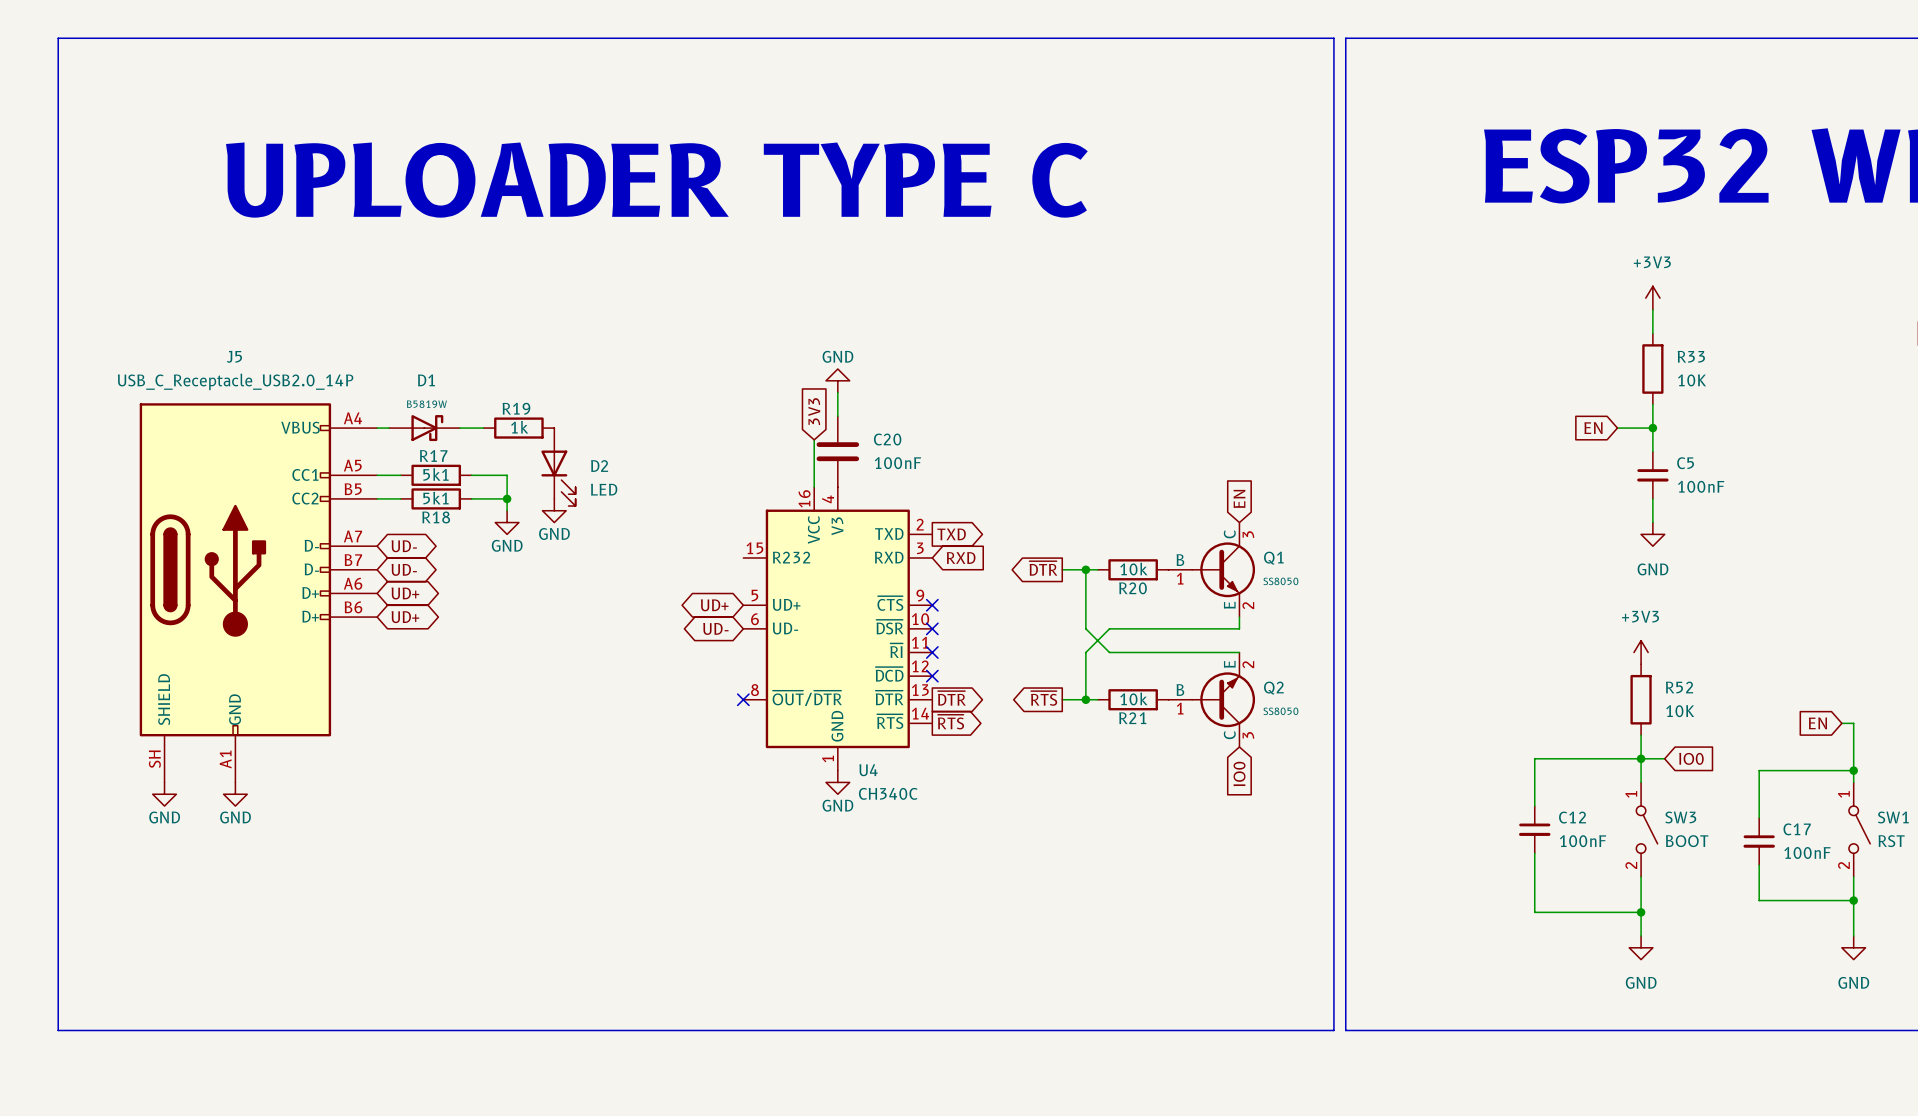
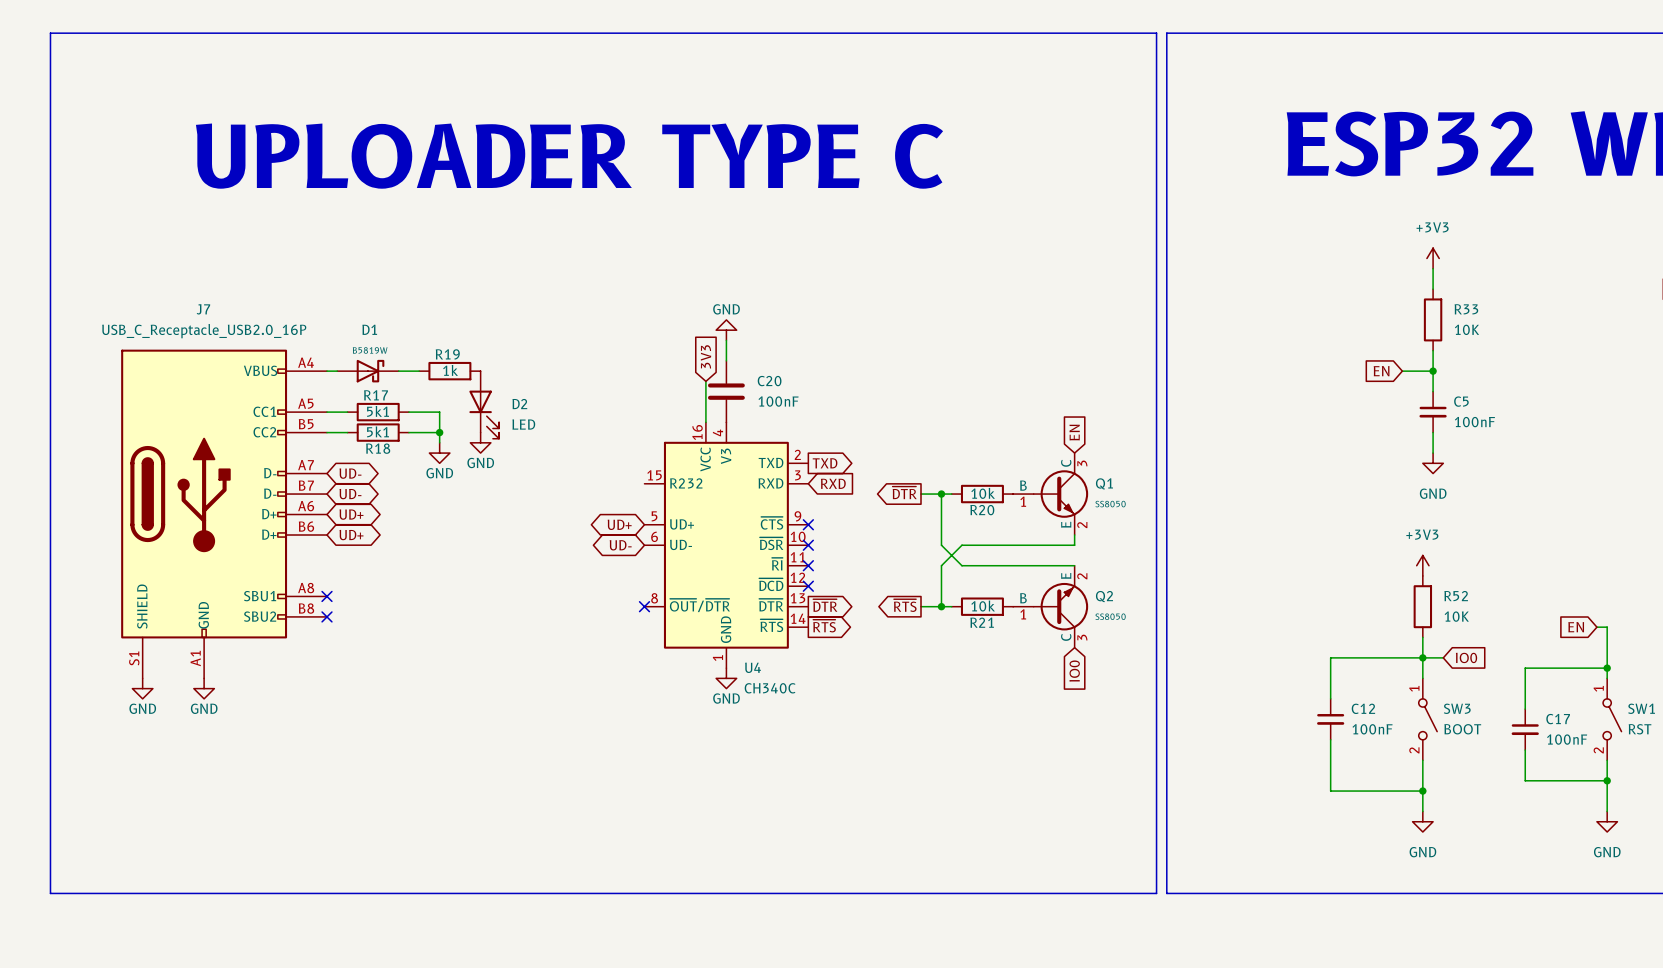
J5: USB_C_Receptacle_USB2.0_14P (258, 592) -> none
J7: none -> USB_C_Receptacle_USB2.0_16P (224, 514)
no-connect mark: none -> (326, 596)
no-connect mark: none -> (326, 616)

